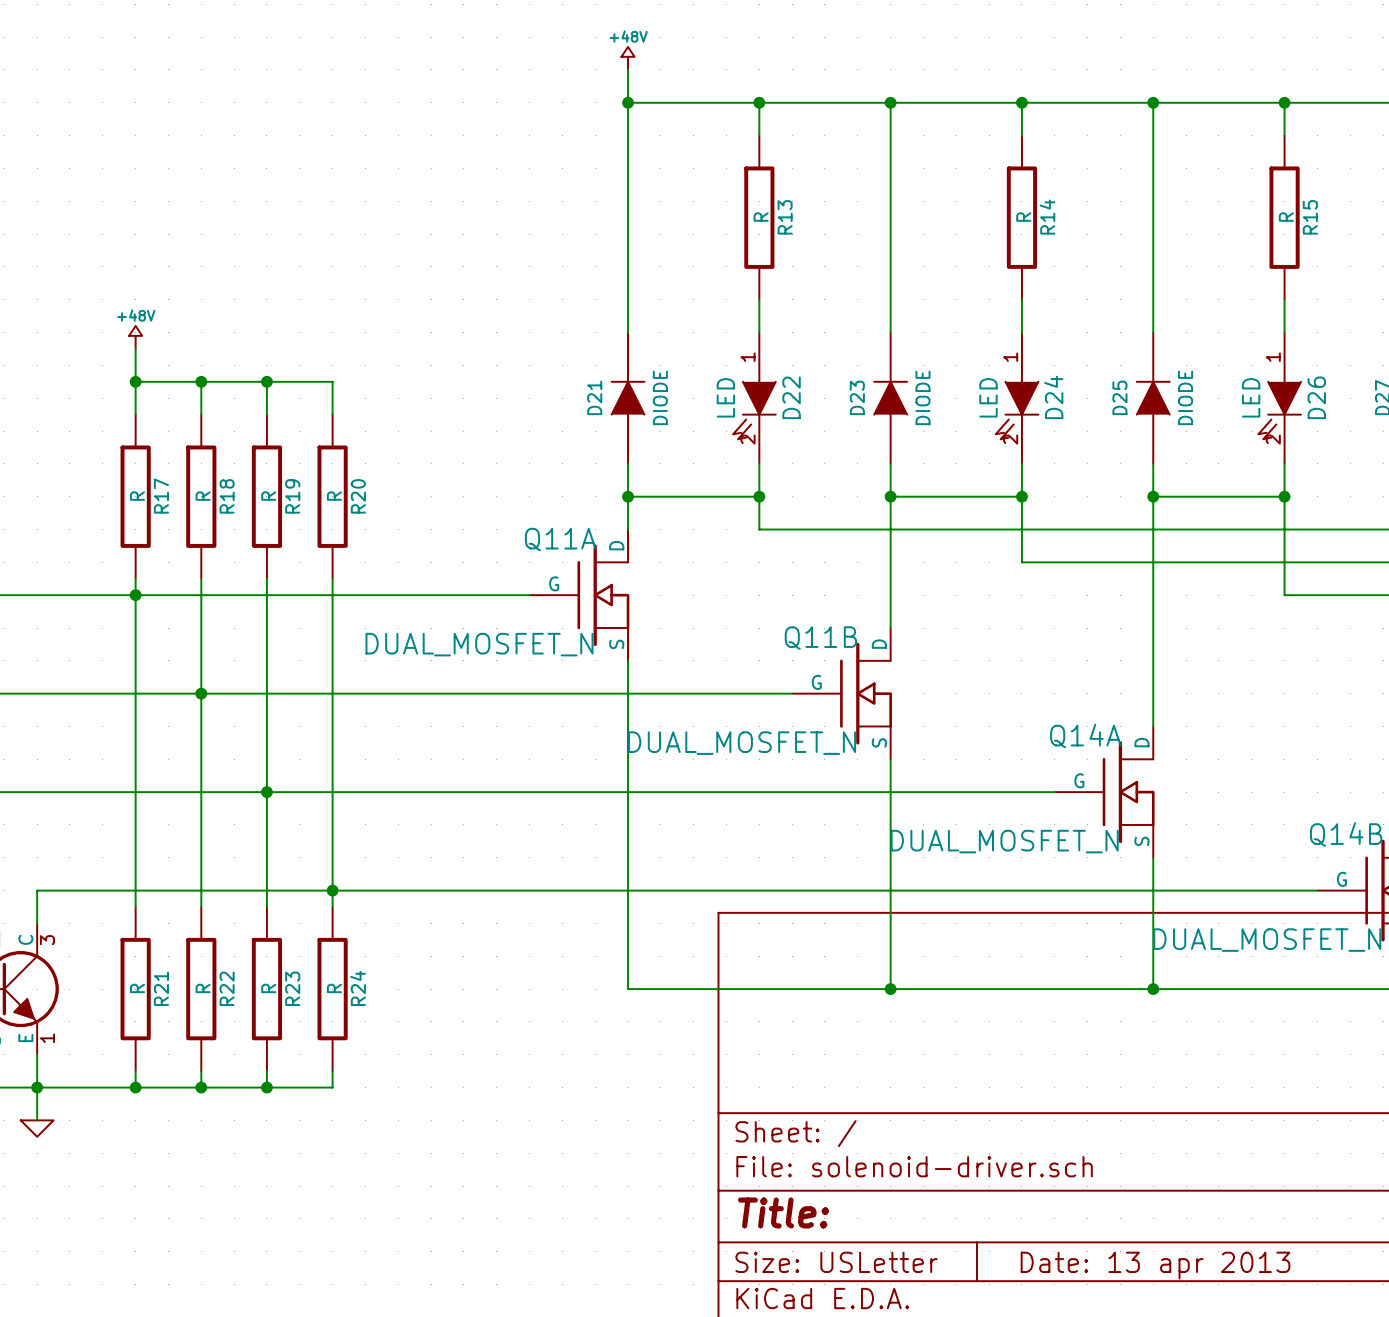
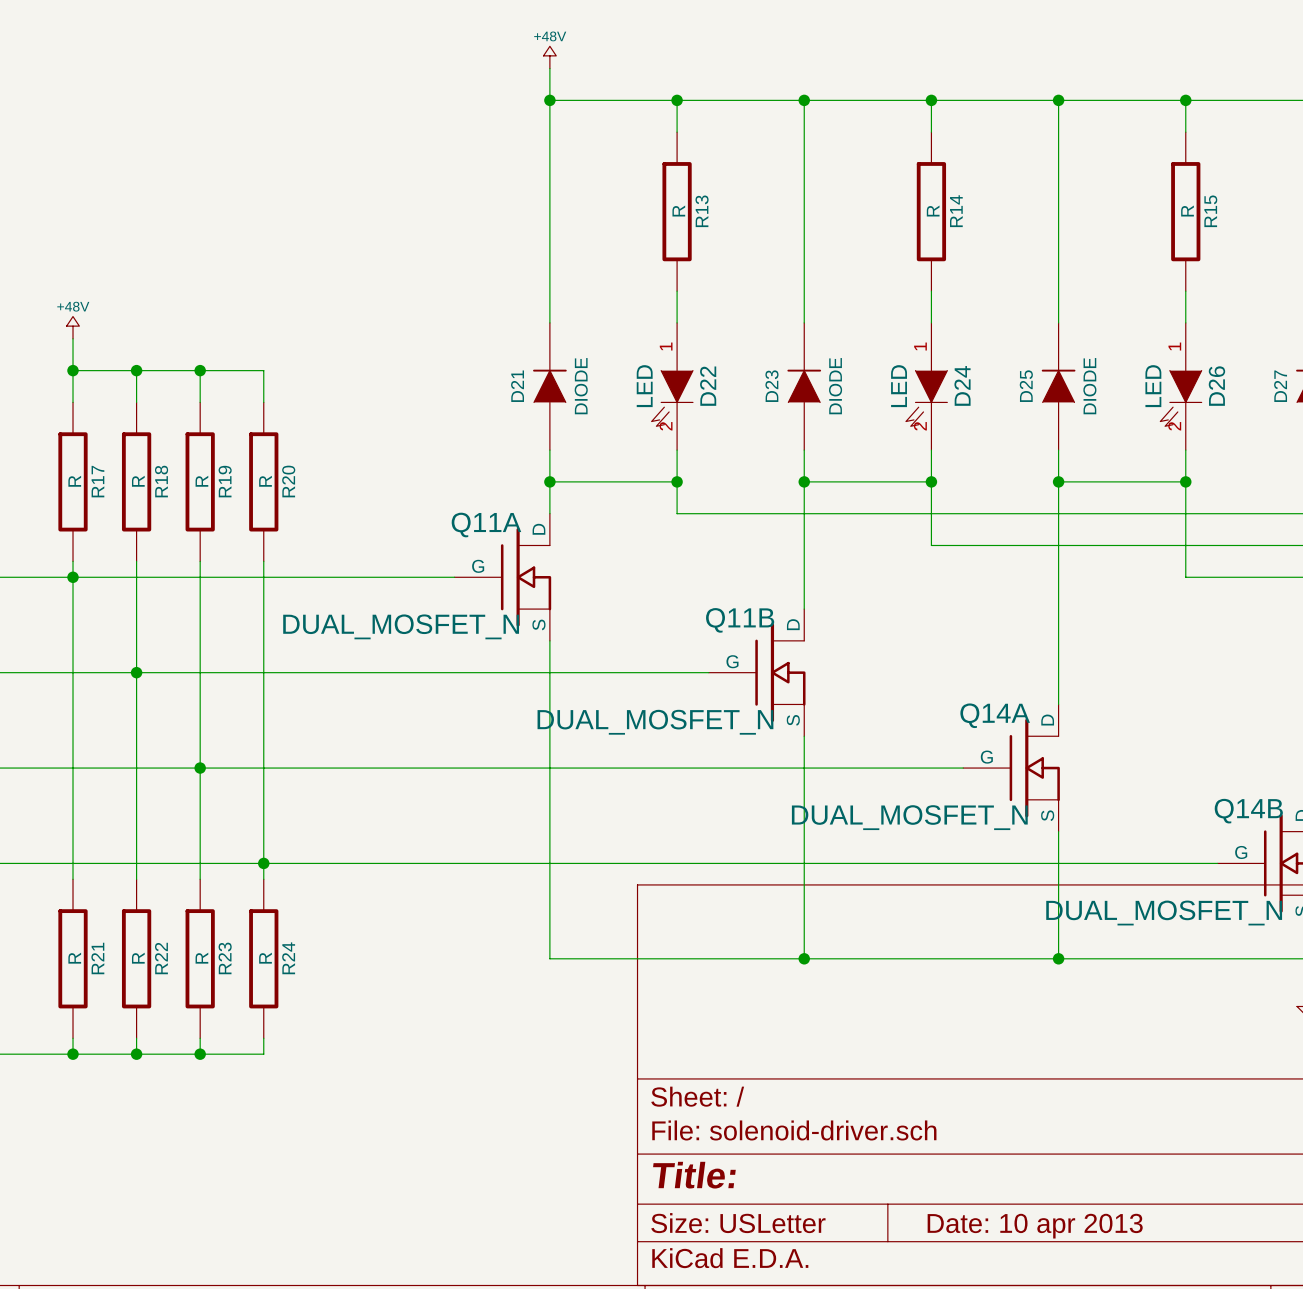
title block: Date: 13 apr 2013 (1155, 1265) -> Date: 10 apr 2013 (1035, 1226)

